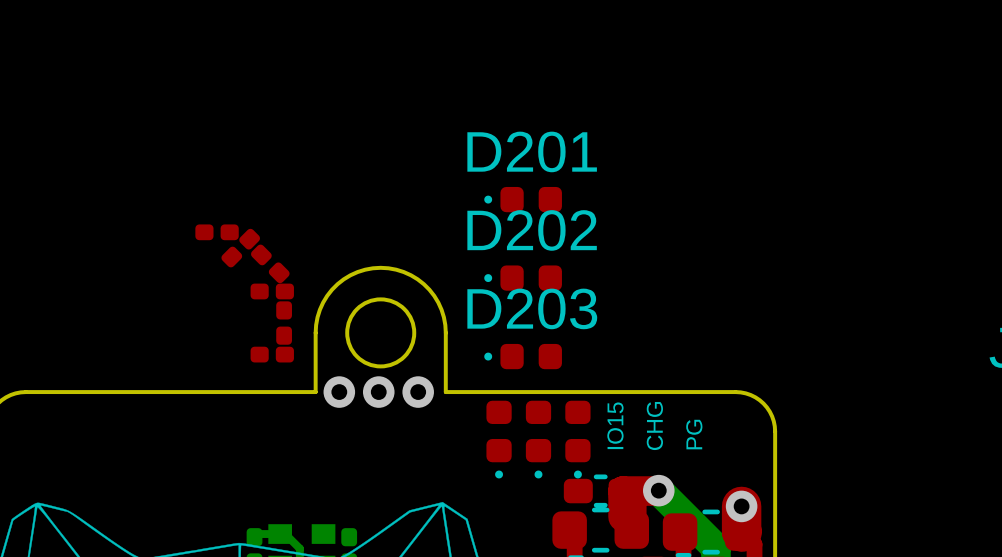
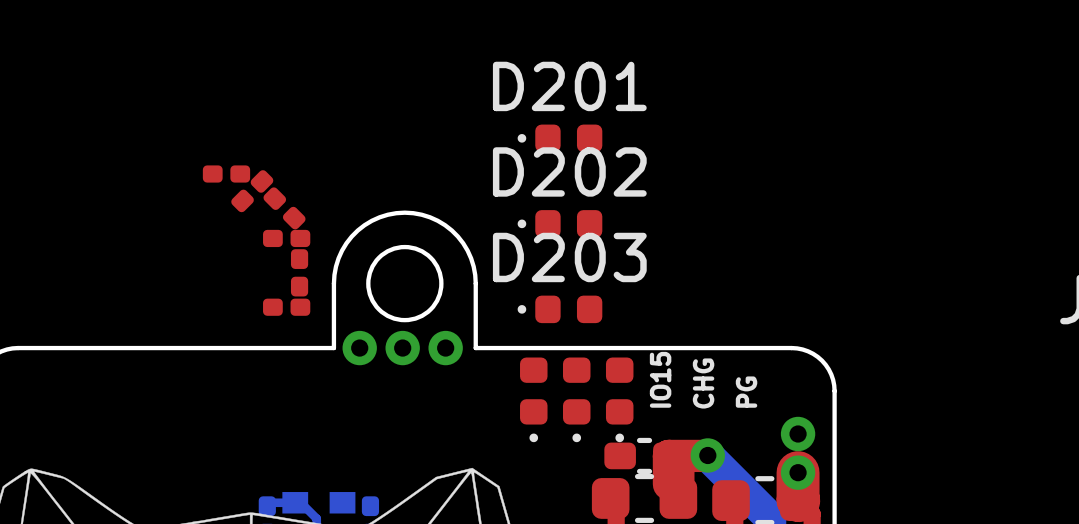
via: none -> (798, 434)

